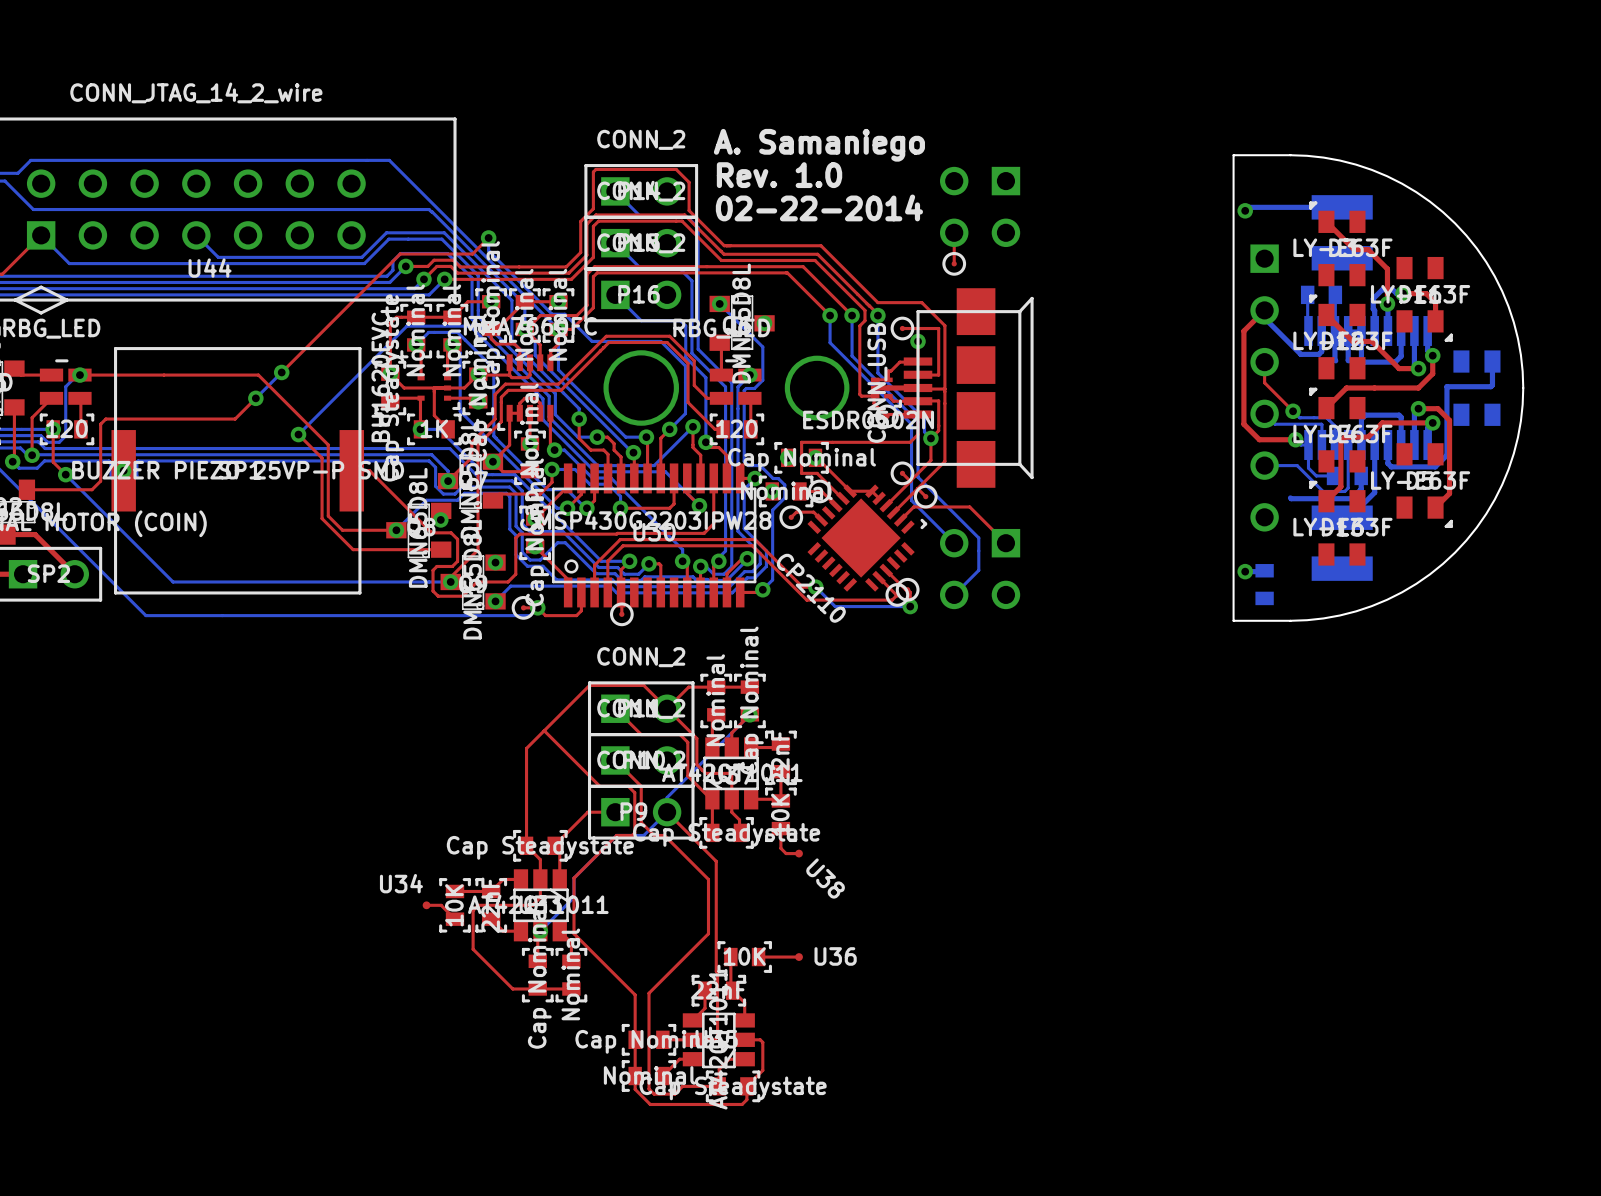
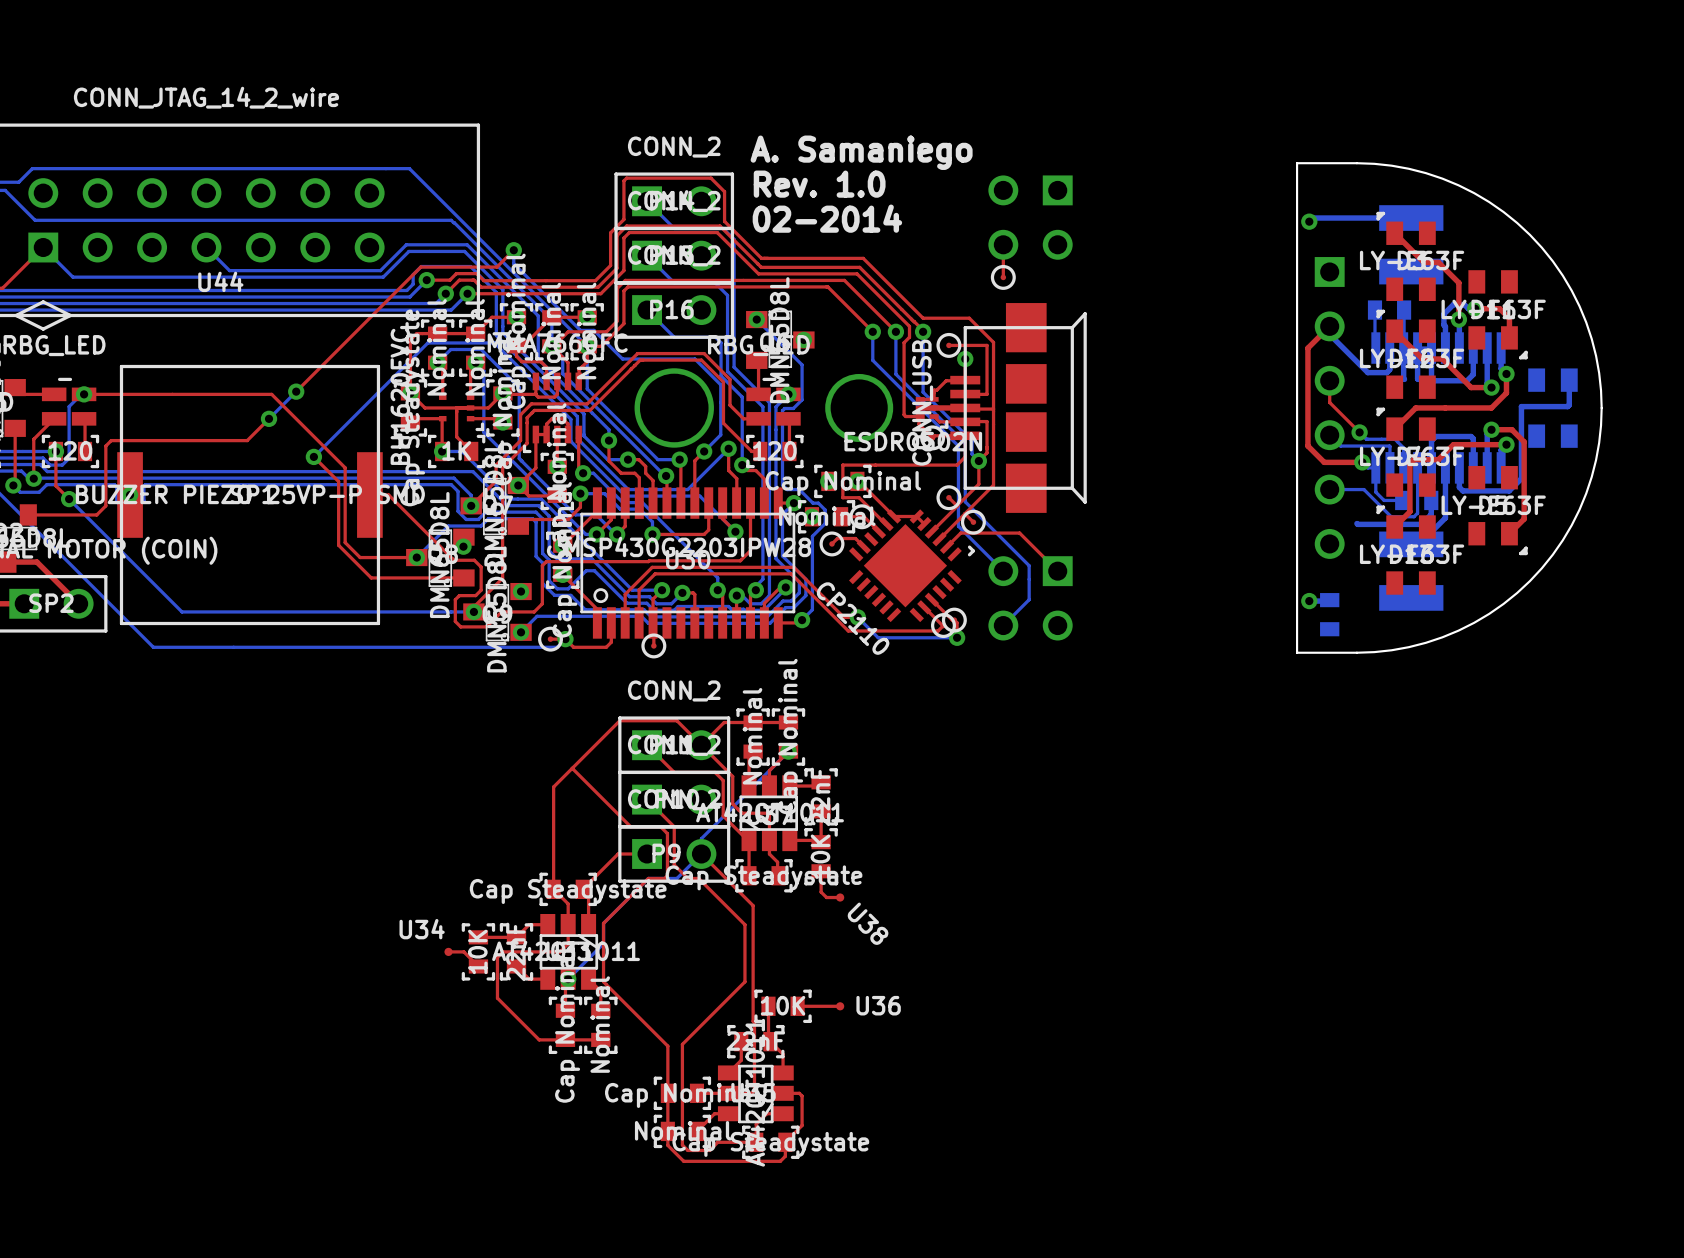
text: 02-22-2014 (819, 207) -> 02-2014 (827, 218)

